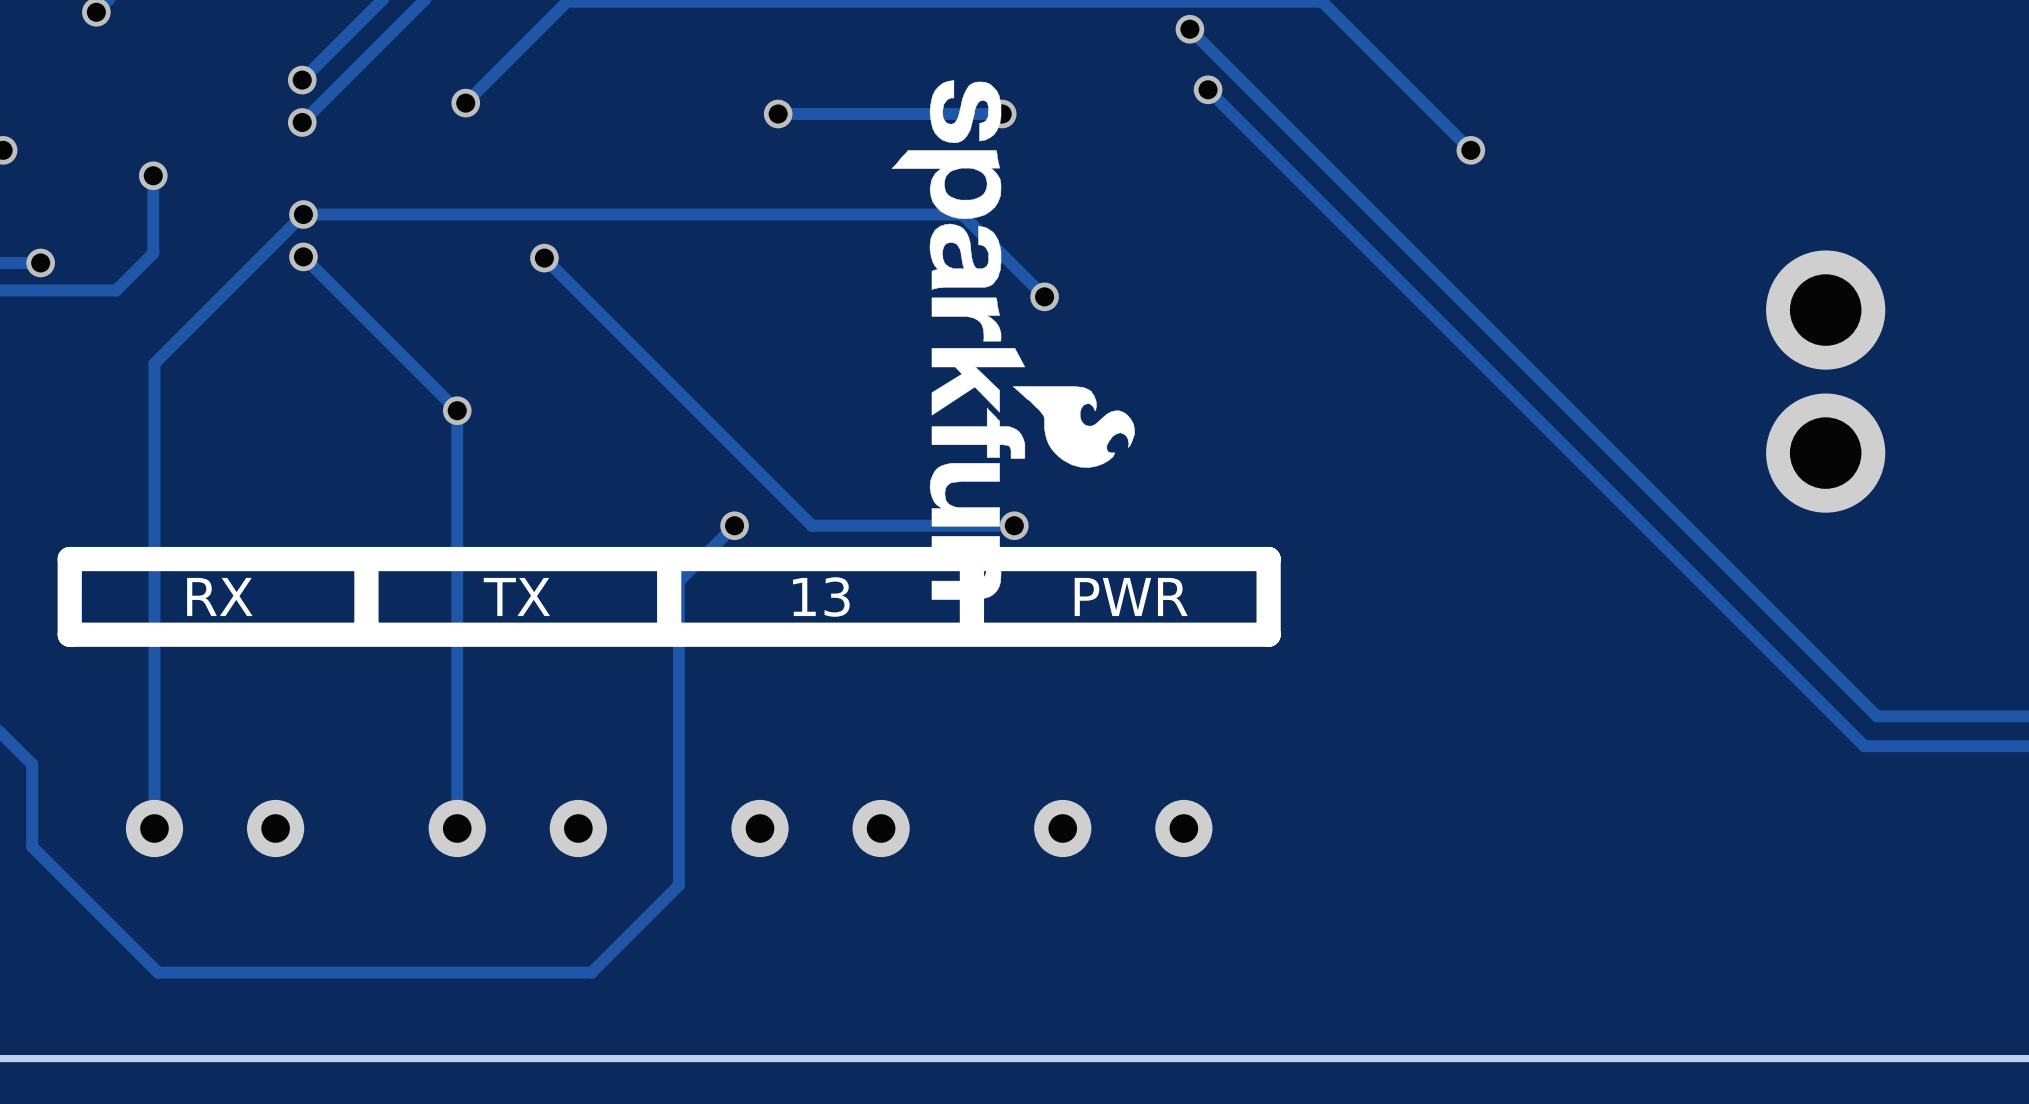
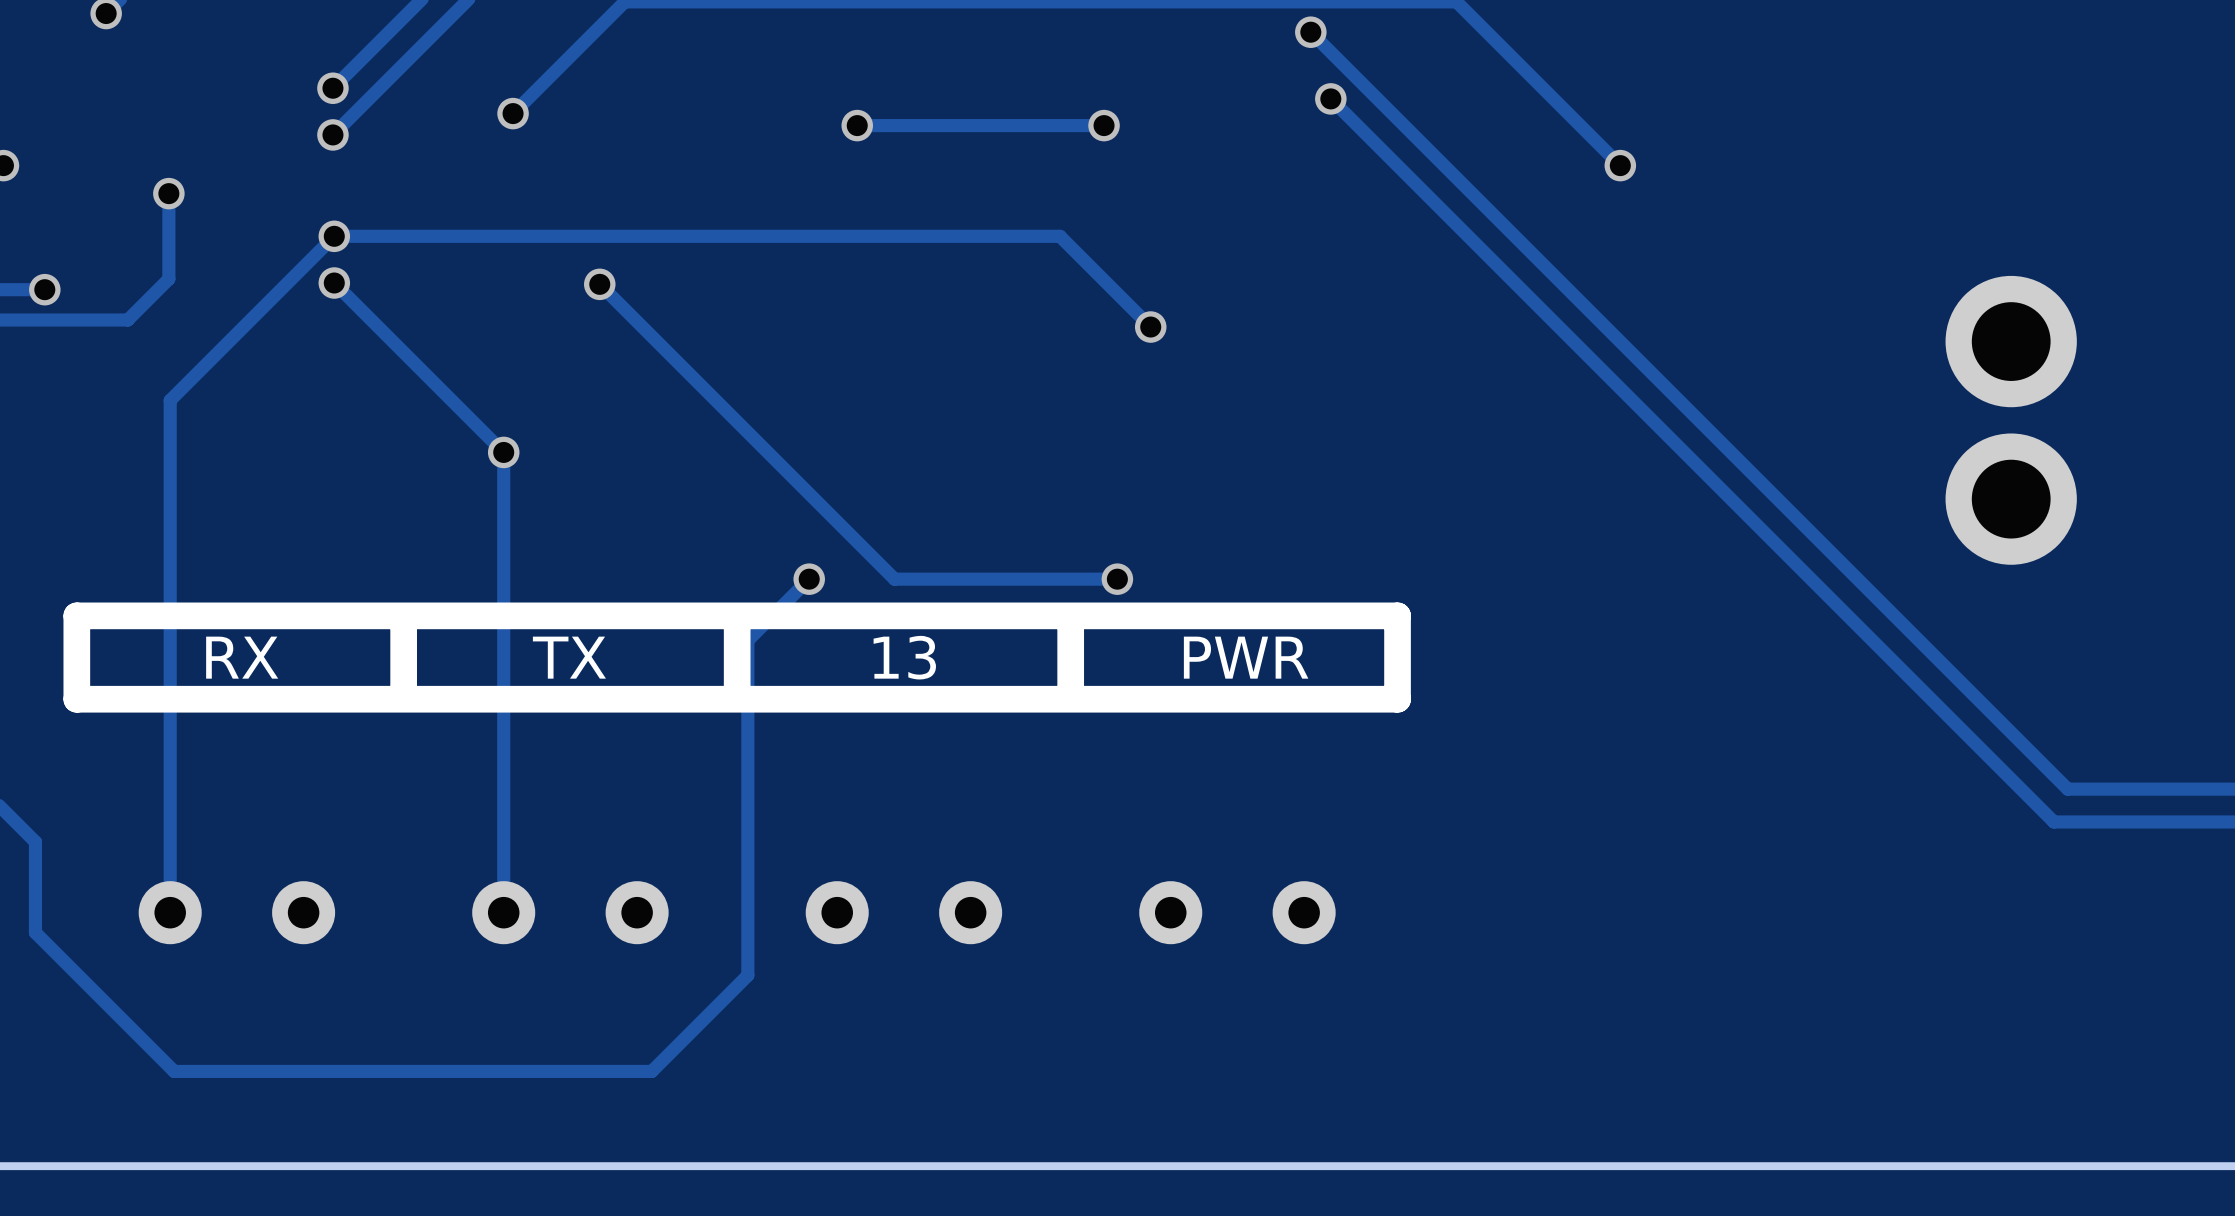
drawing: [891, 80, 1135, 600] -> none

